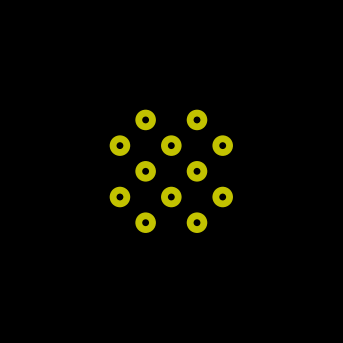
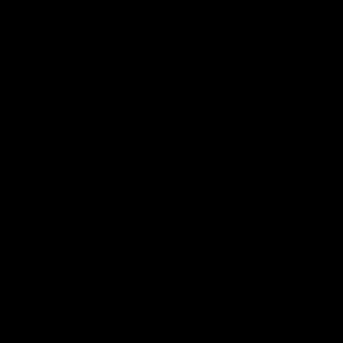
part: (171, 171) -> none

